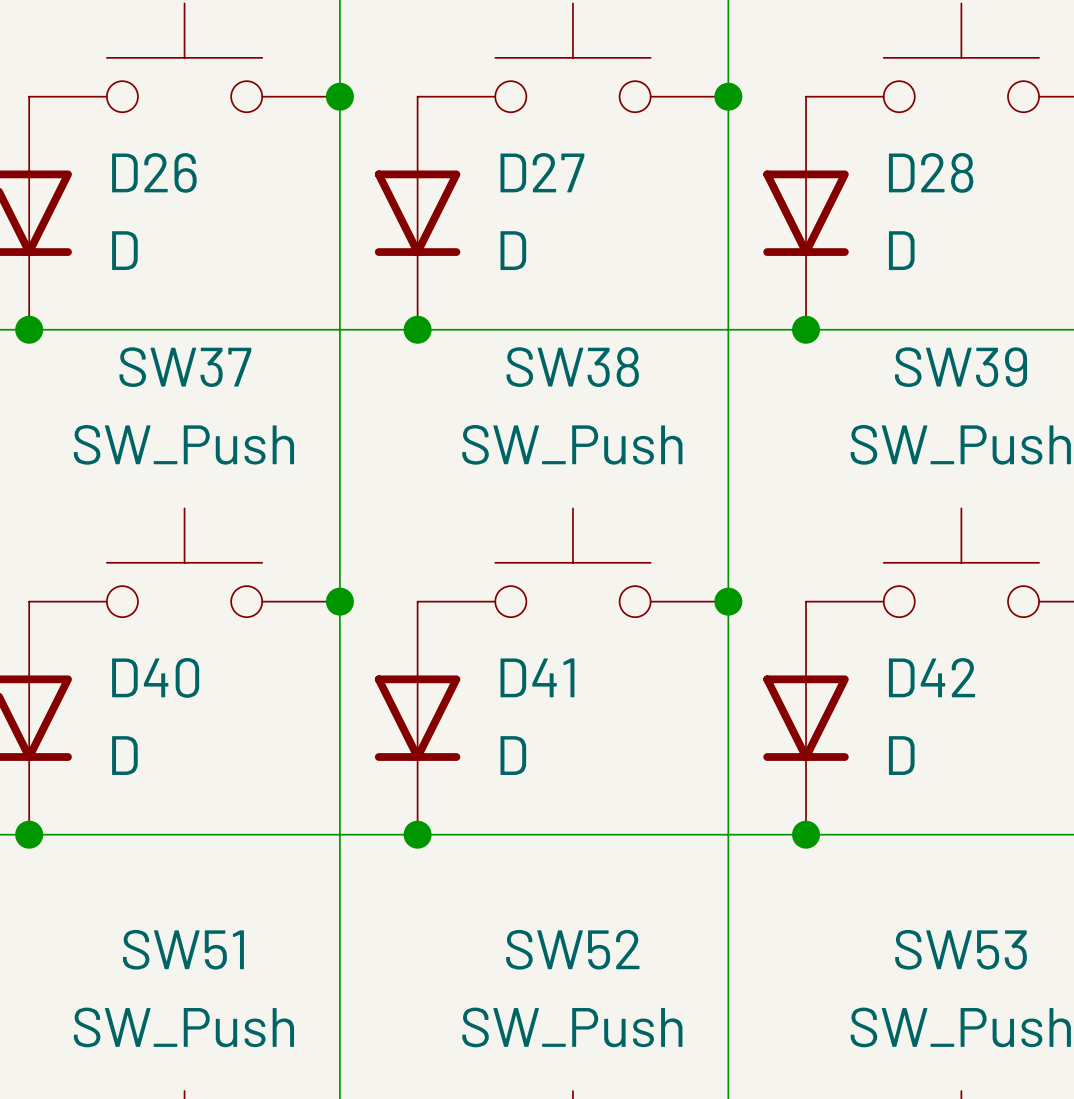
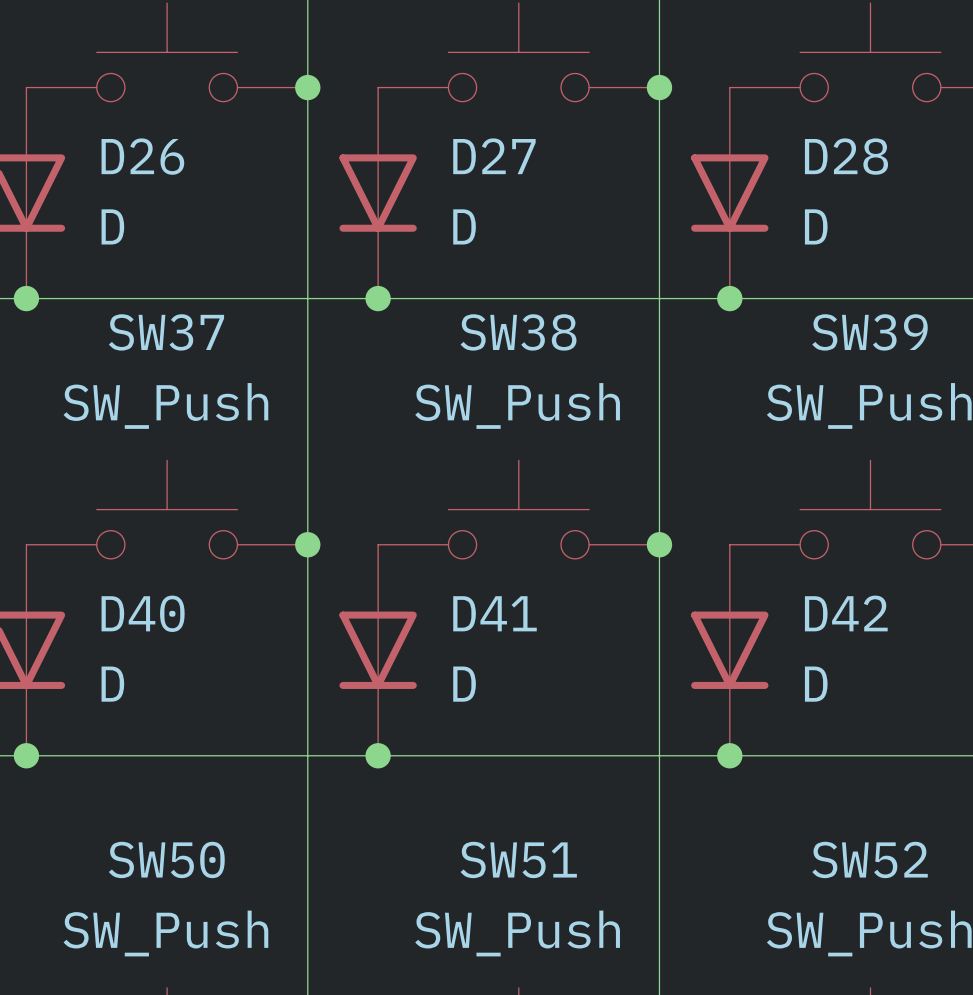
SW51 name: SW51 (183, 949) -> SW50 (166, 859)
SW52 name: SW52 (572, 949) -> SW51 (518, 859)
SW53 name: SW53 (961, 949) -> SW52 (870, 859)

